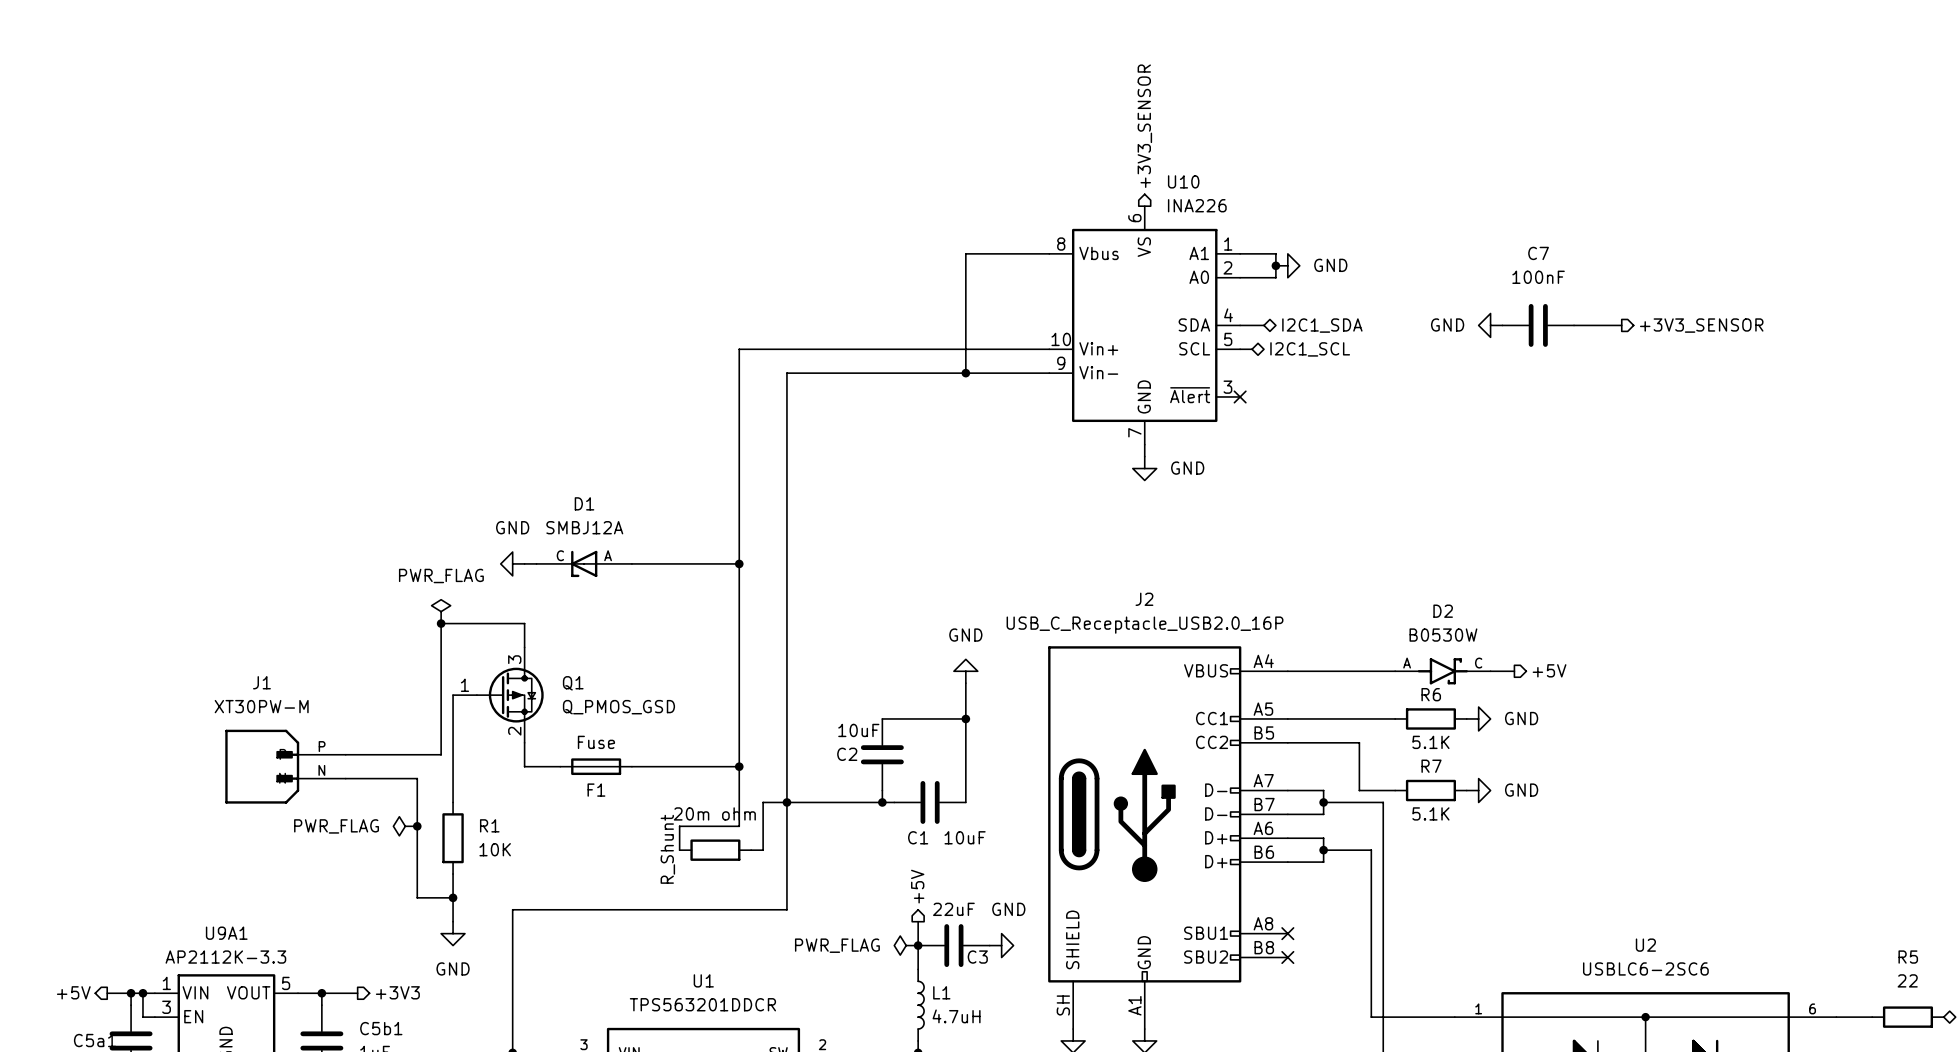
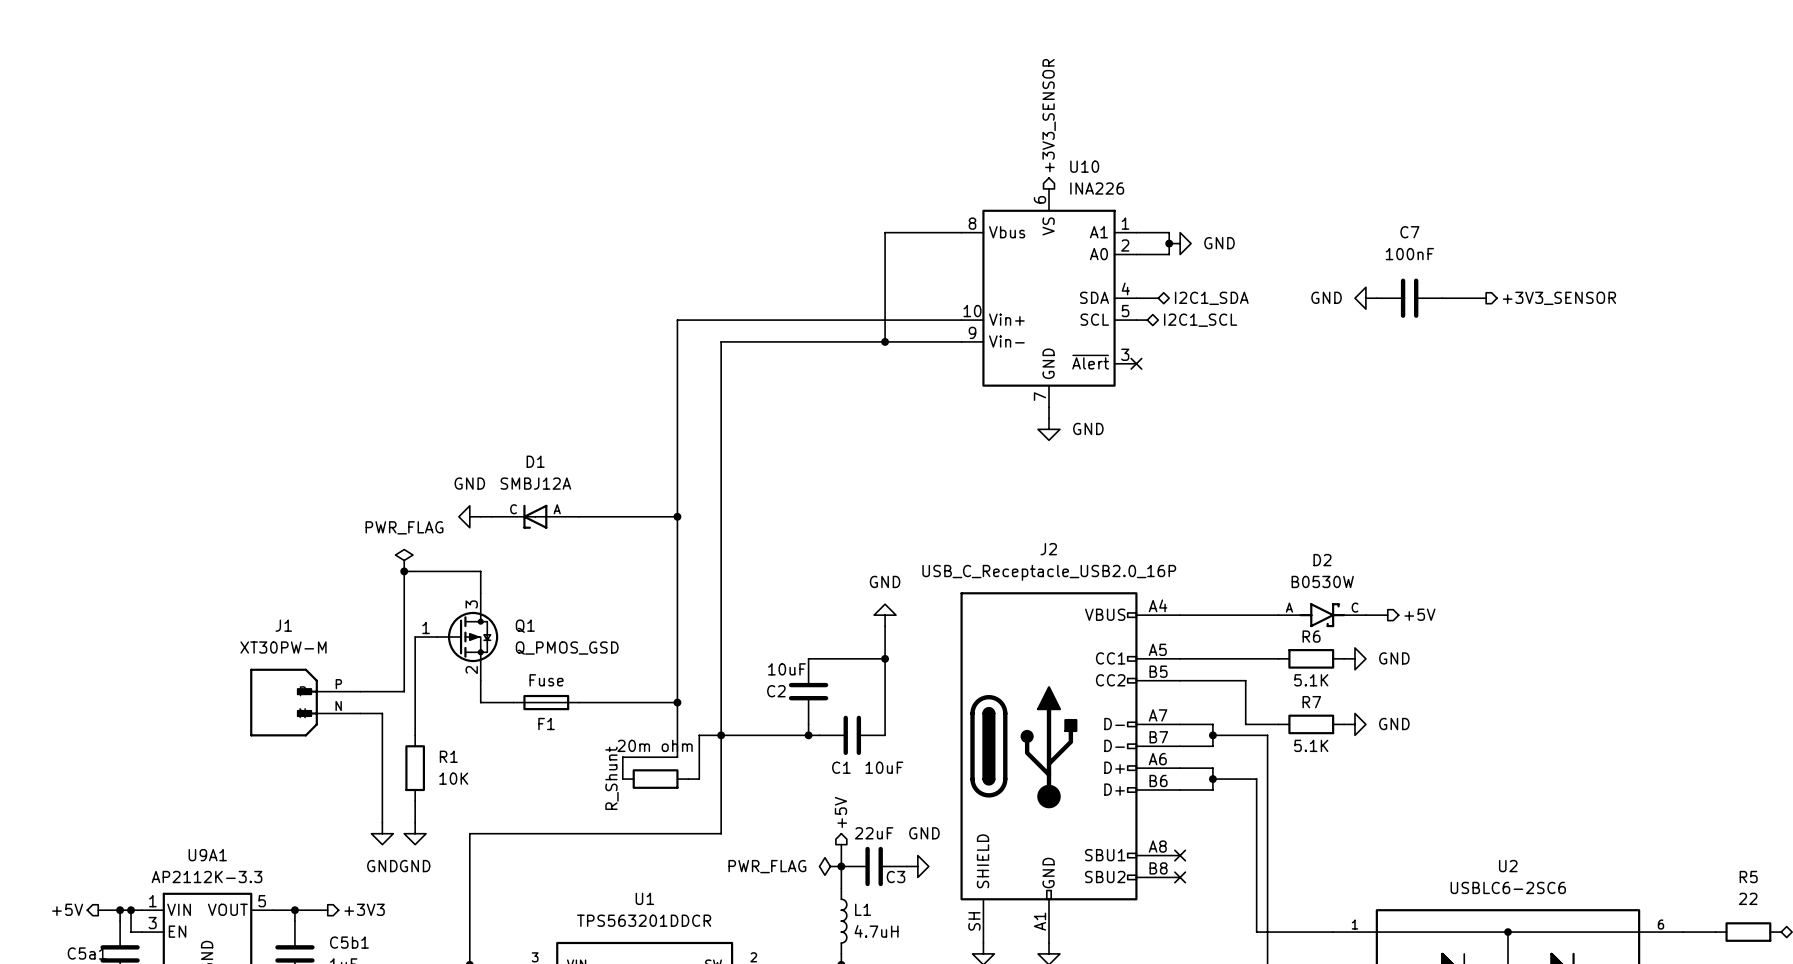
J1 position: (285, 766) -> (305, 702)
power symbol: PWR_FLAG (405, 826) -> none
junction: (417, 826) -> none
wire: (417, 897) (453, 897) (453, 921) -> none
junction: (453, 897) -> none
power symbol: none -> GND (382, 833)
power symbol: none -> GND (415, 833)
power symbol: GND (453, 933) -> none

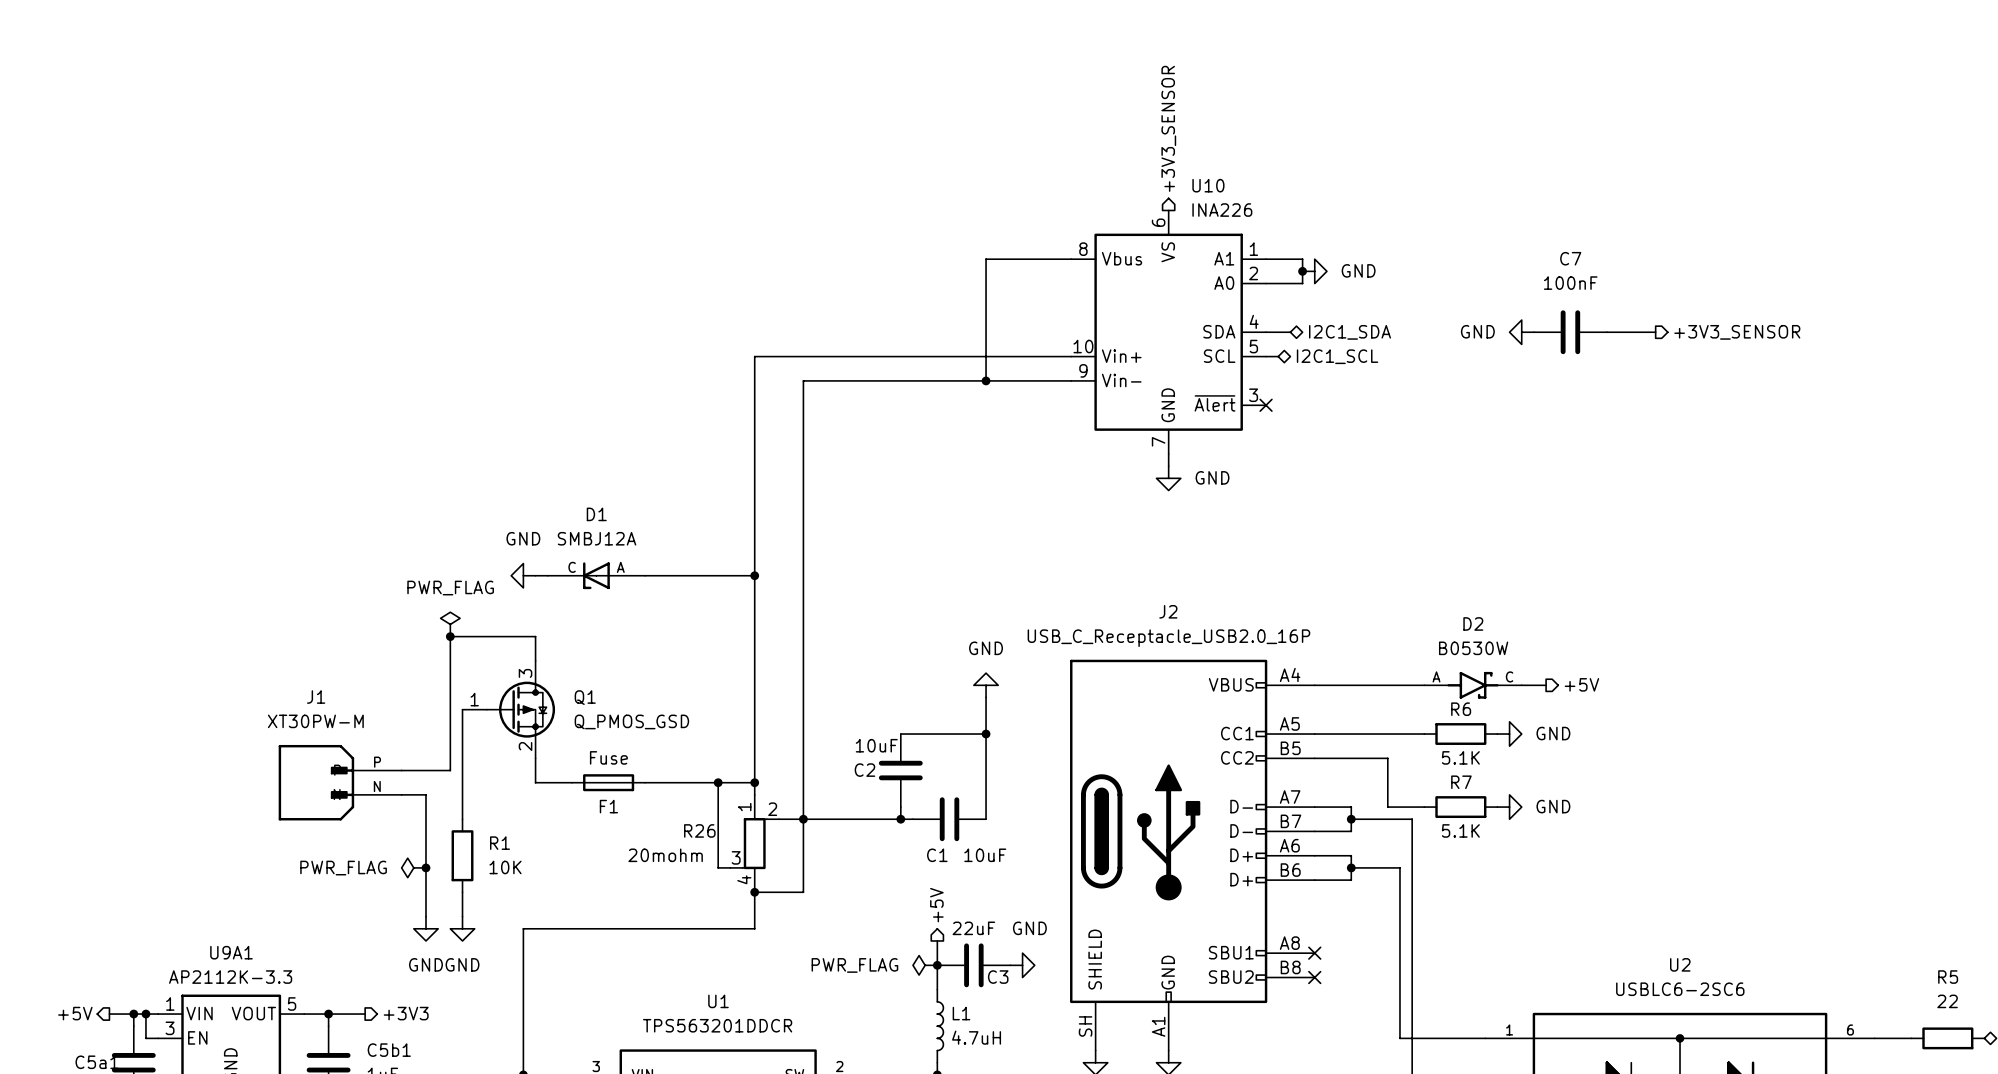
wire: none -> (718, 782) (718, 867) (730, 867)
junction: none -> (718, 782)
wire: (677, 713) (677, 757) (622, 757) (622, 779) -> none
wire: (699, 735) (699, 779) (688, 779) -> none
R26: none -> 20mohm (754, 843)
power symbol: none -> PWR_FLAG (413, 867)
junction: none -> (425, 867)
part: 20m ohm (655, 779) -> none
junction: none -> (754, 892)
wire: (721, 800) (721, 833) (677, 833) -> (803, 892) (754, 892) (754, 928)

